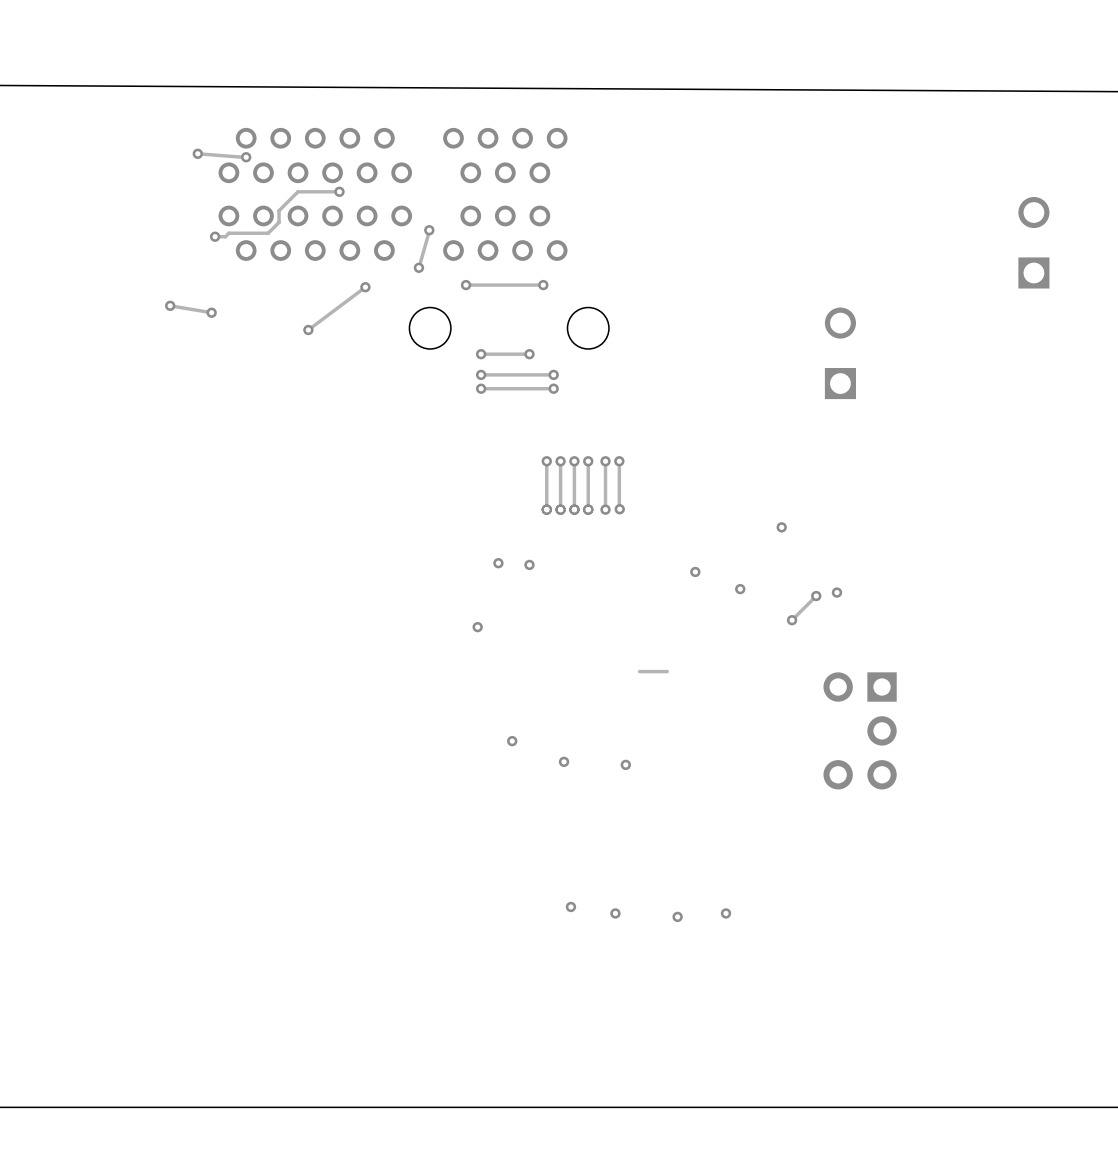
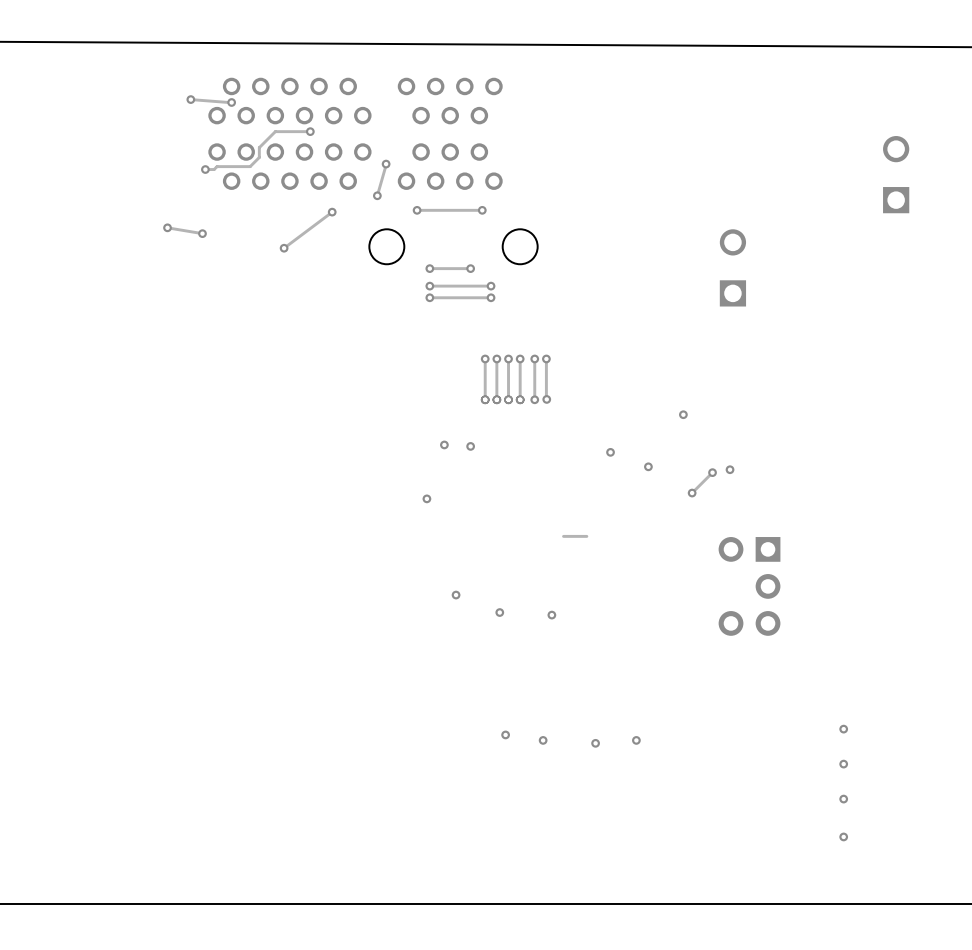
via: none -> (843, 729)
via: none -> (843, 764)
via: none -> (843, 799)
via: none -> (843, 836)

